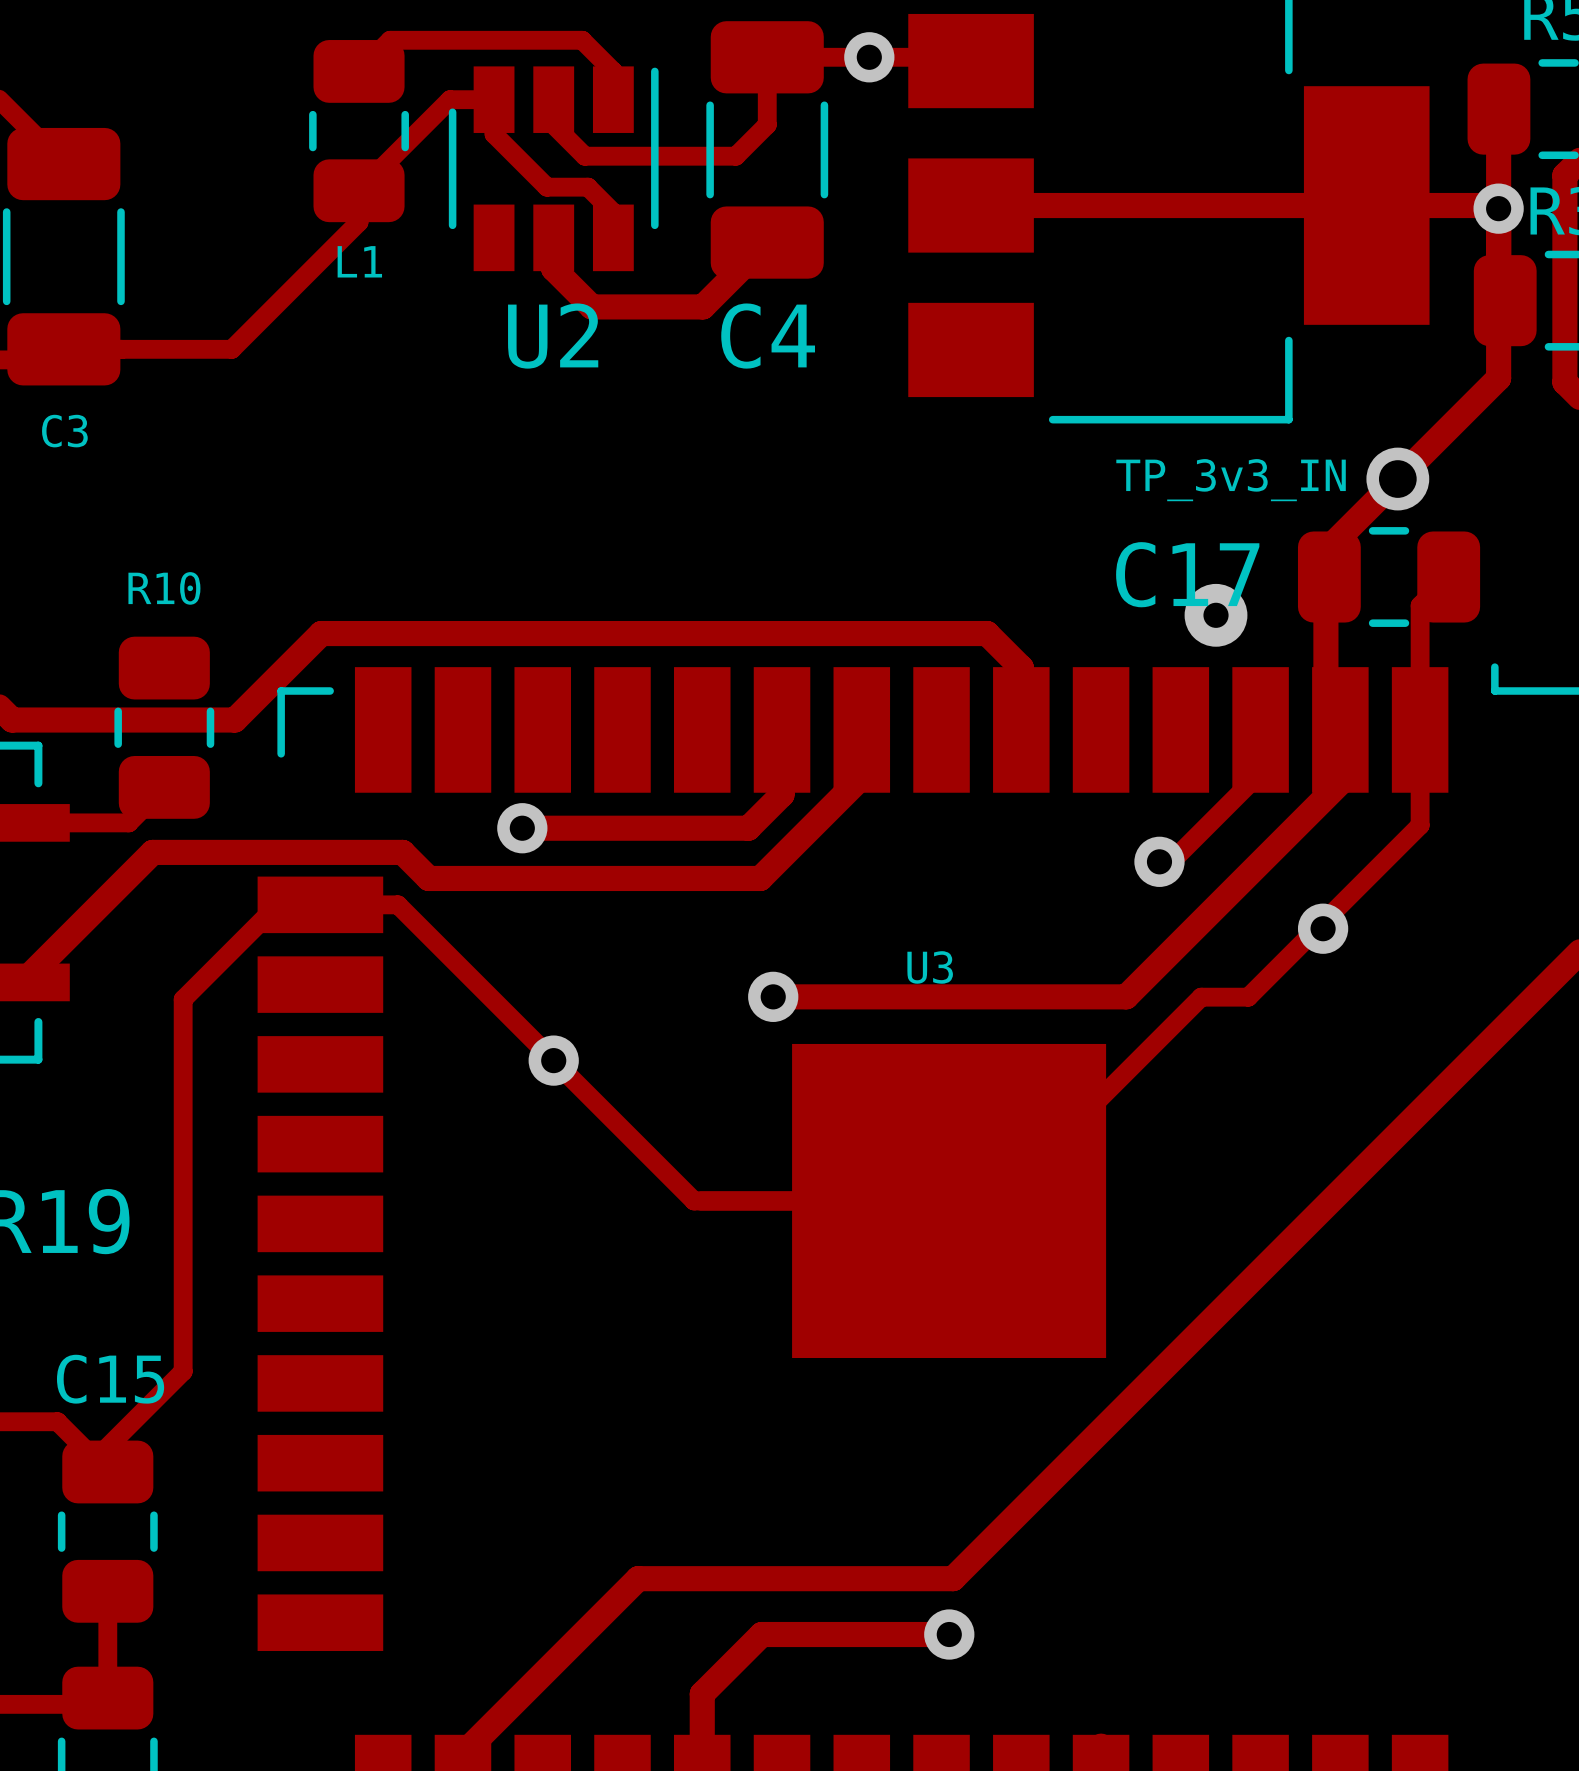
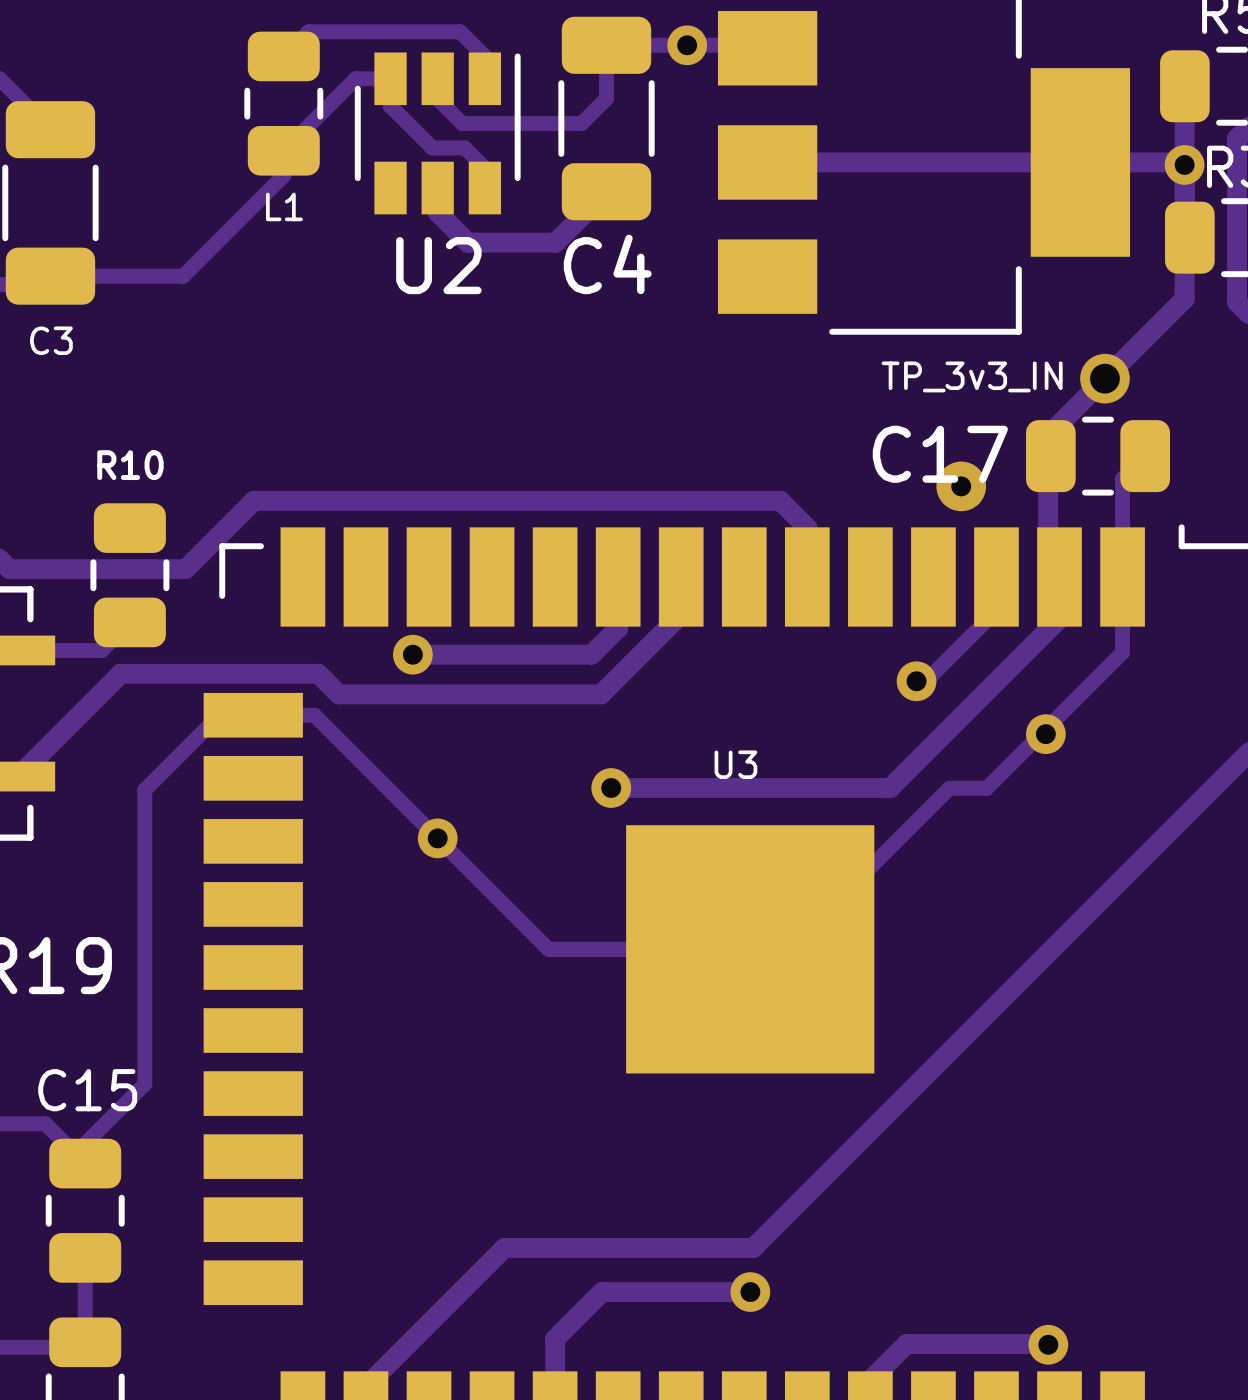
track: none -> (1048, 1344) (906, 1344) (870, 1380)
via: none -> (1048, 1344)

